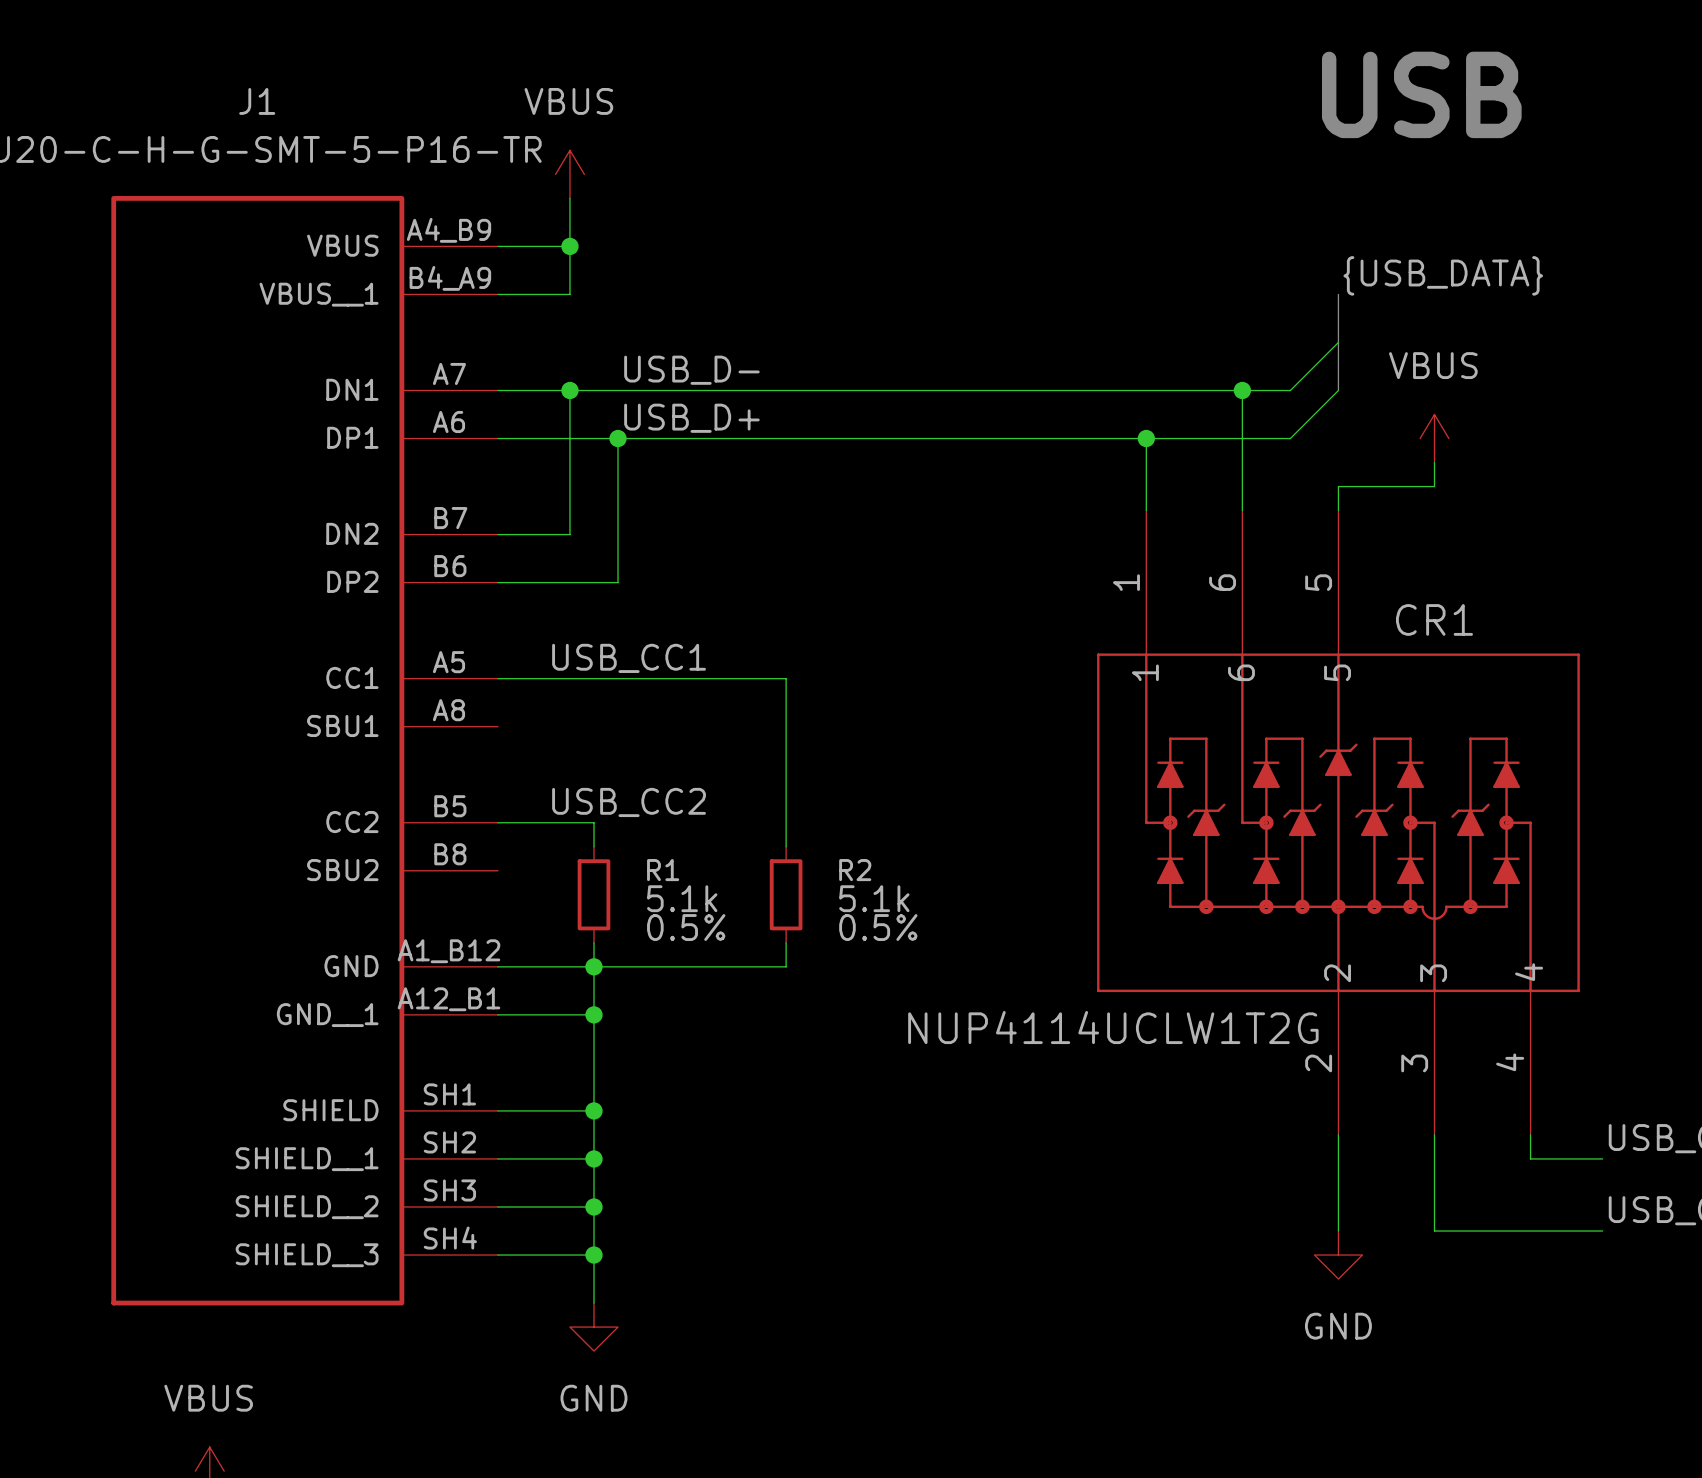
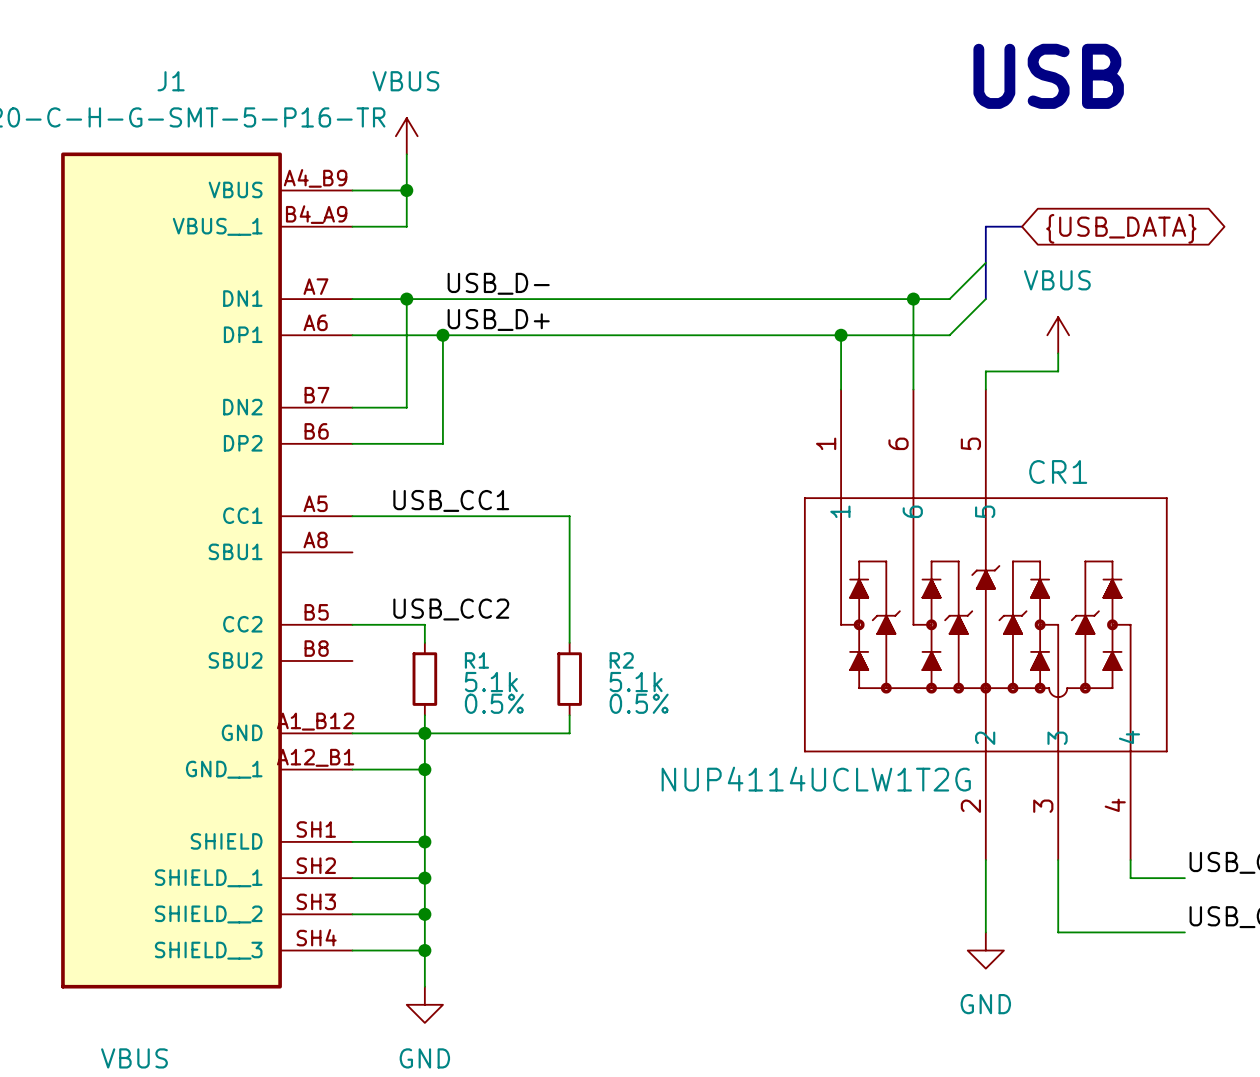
label: {USB_DATA} (1443, 275) -> none
bus: none -> (985, 226) (1022, 226)
global label: none -> {USB_DATA} (1121, 228)

